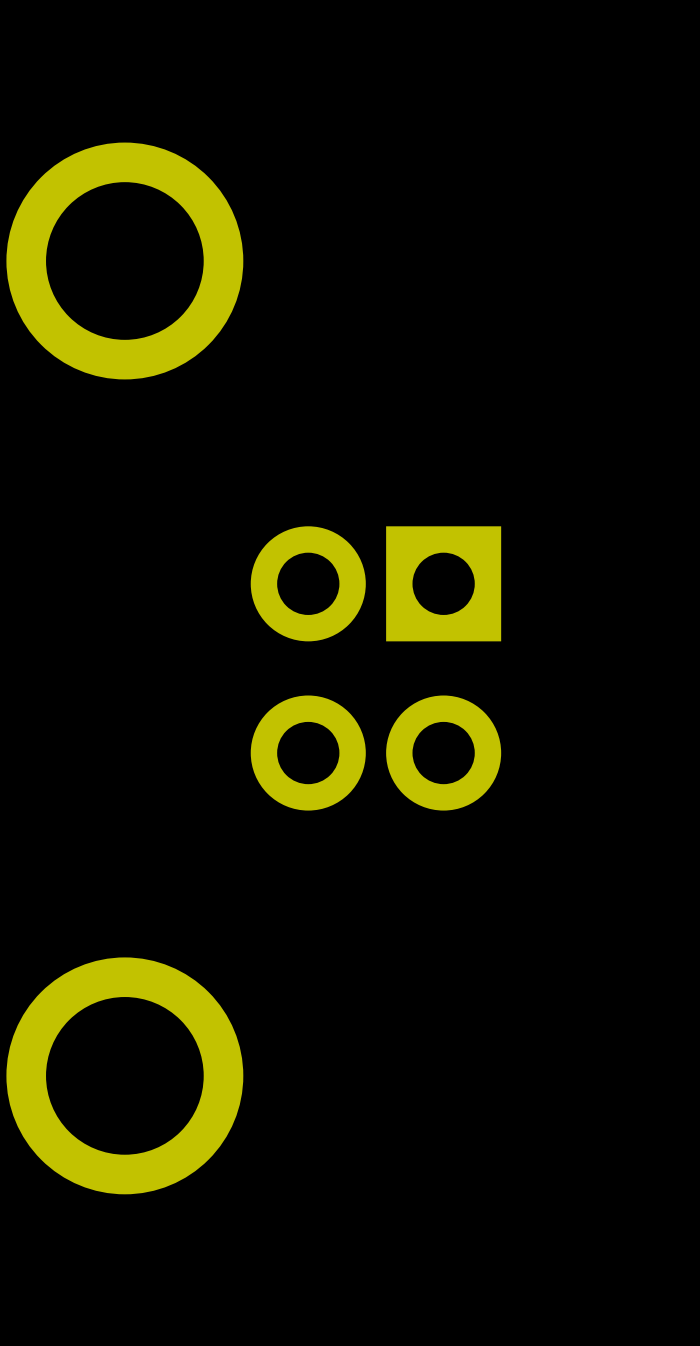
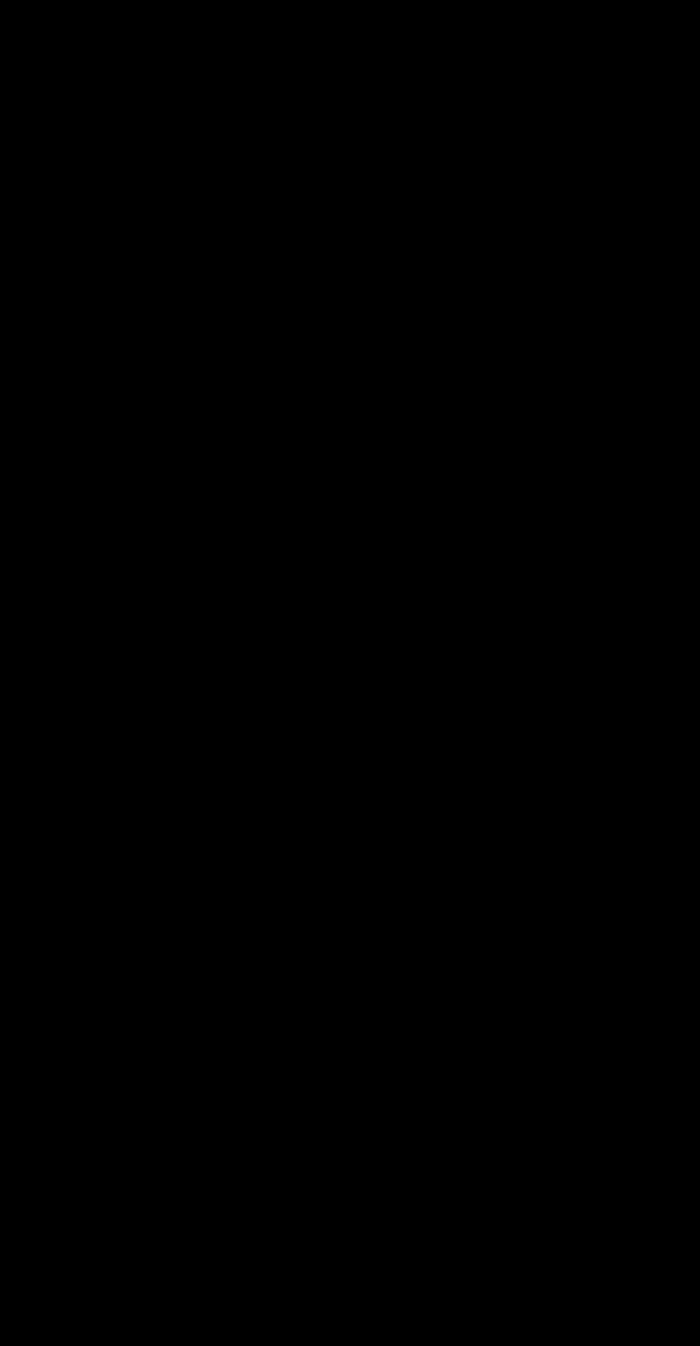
part: (253, 668) -> none

